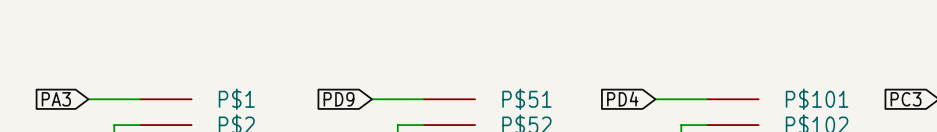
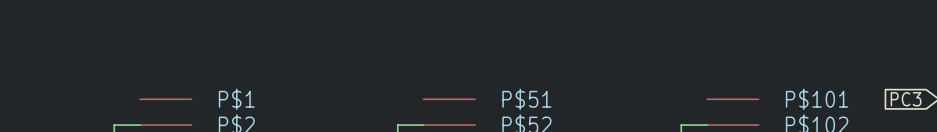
global label: PD4 (622, 98) -> none
global label: PA3 (56, 99) -> none
wire: (88, 99) (140, 99) -> none
global label: PD9 (339, 99) -> none
wire: (372, 99) (423, 99) -> none
wire: (655, 99) (707, 99) -> none

